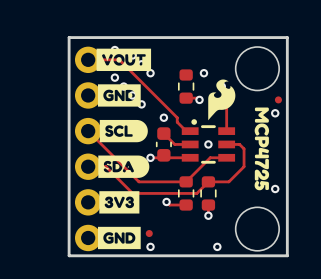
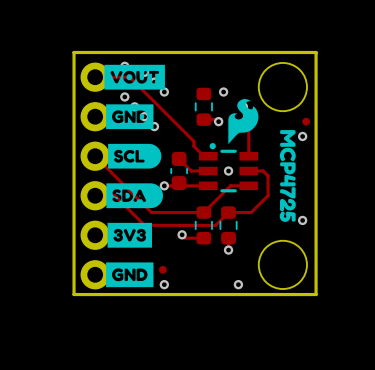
via: (163, 117) -> none

